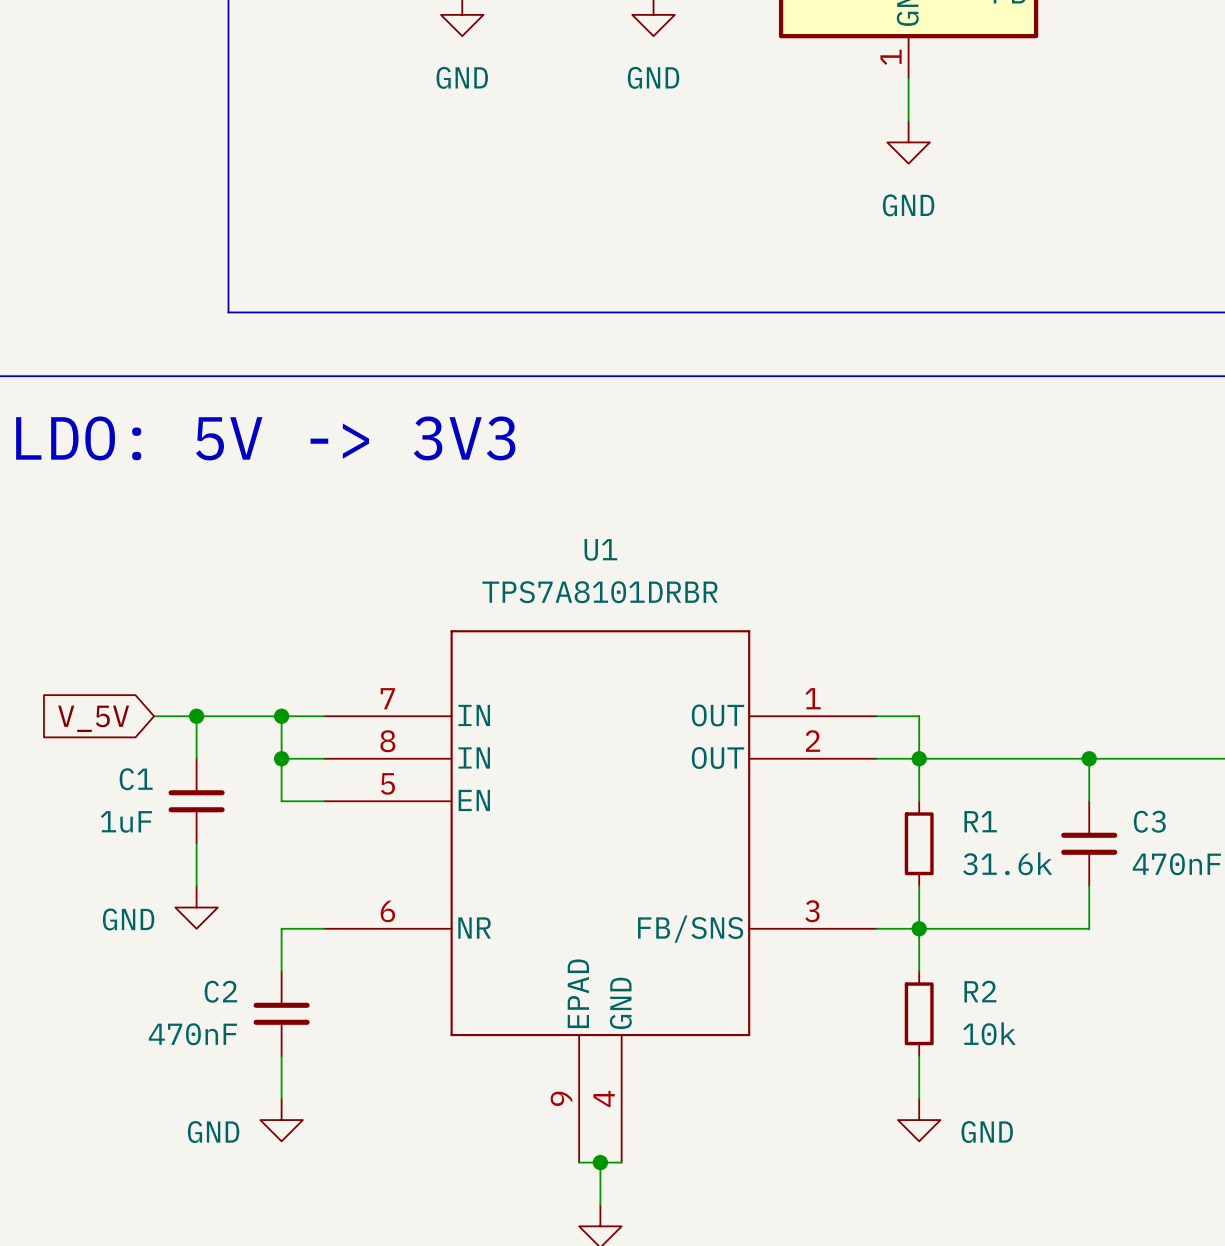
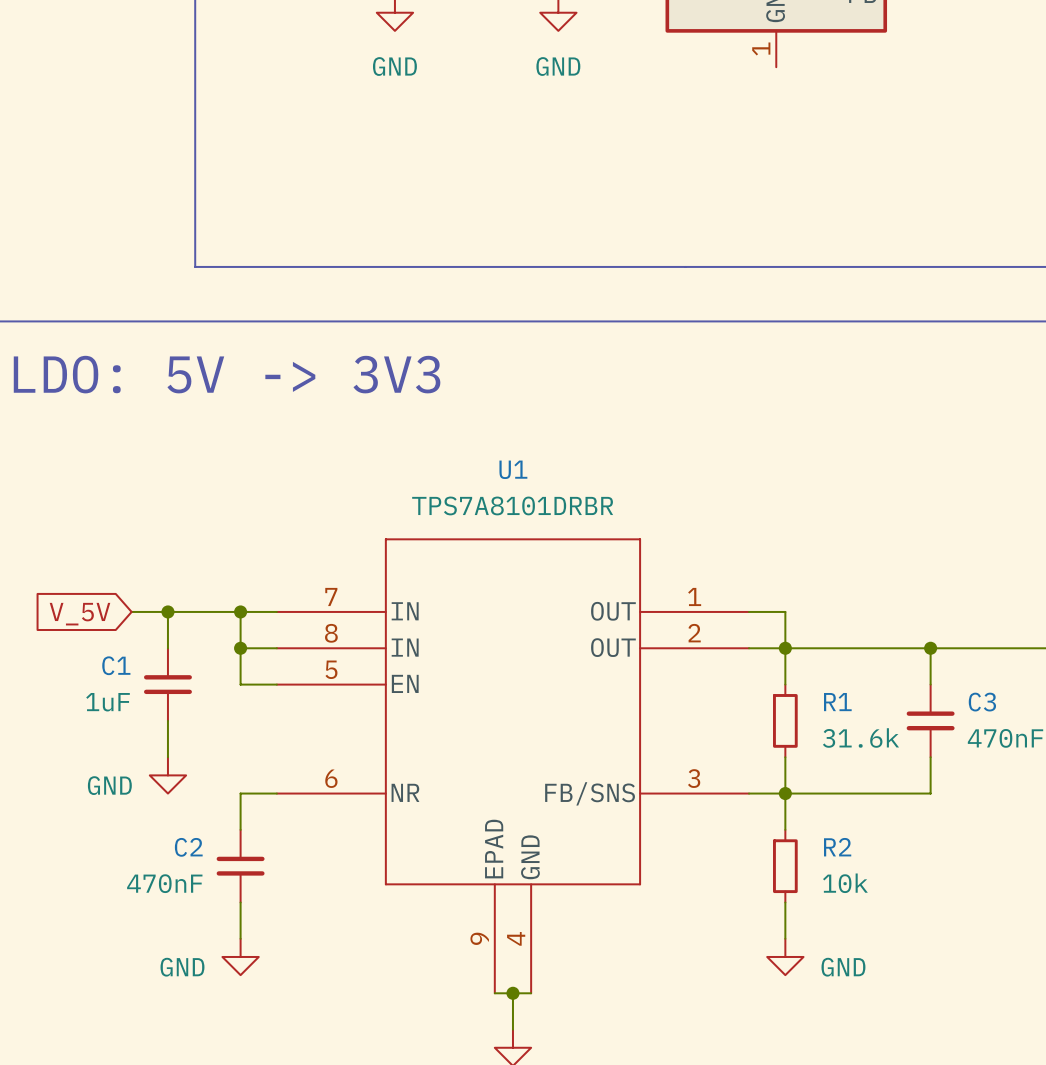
wire: (908, 78) (908, 121) -> none
power symbol: GND (908, 142) -> none

